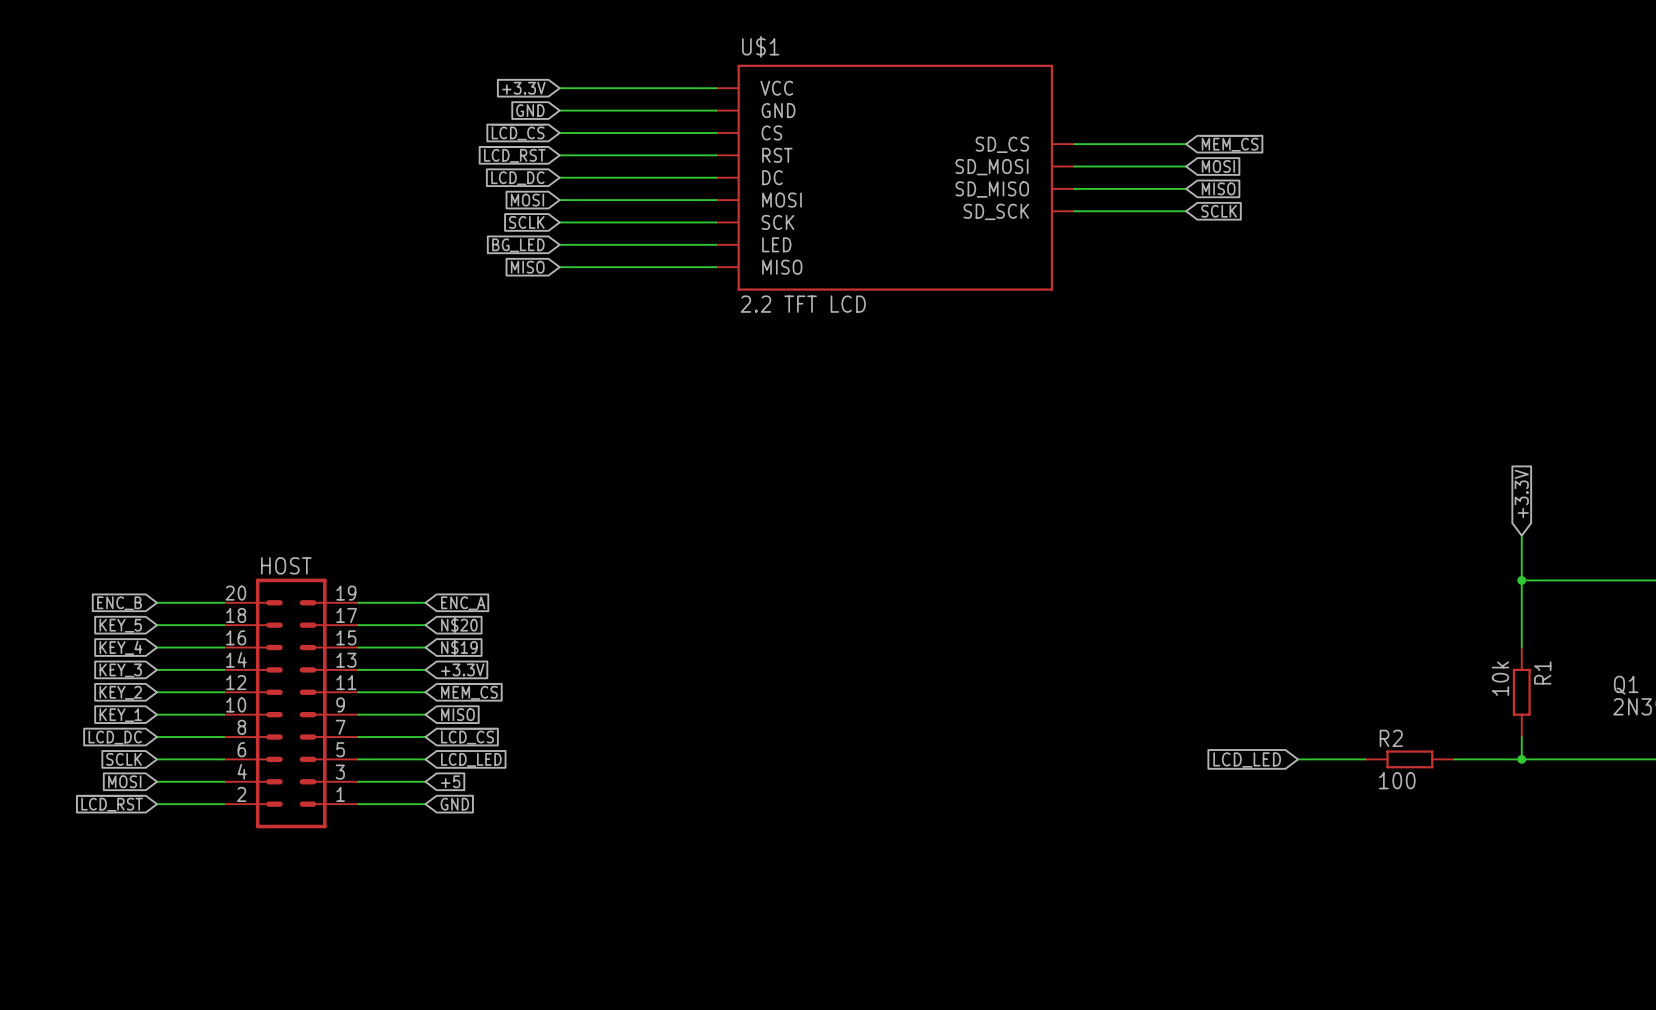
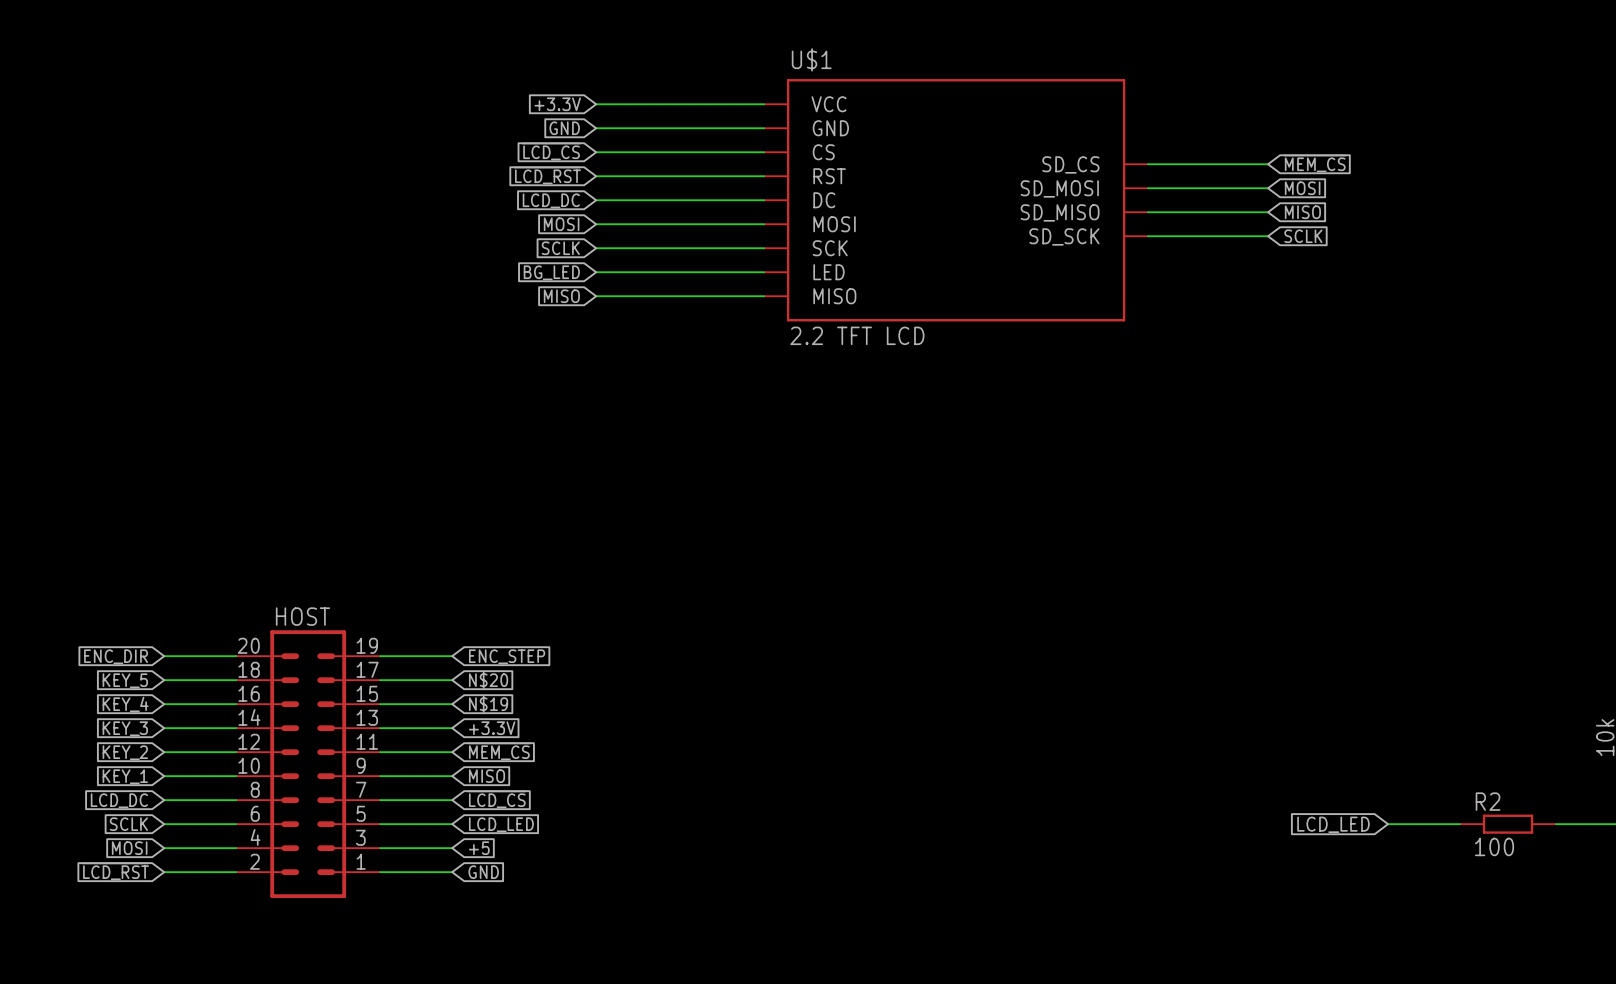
global label: ENC_B (119, 603) -> ENC_DIR (116, 656)
global label: ENC_A (463, 603) -> ENC_STEP (507, 656)

